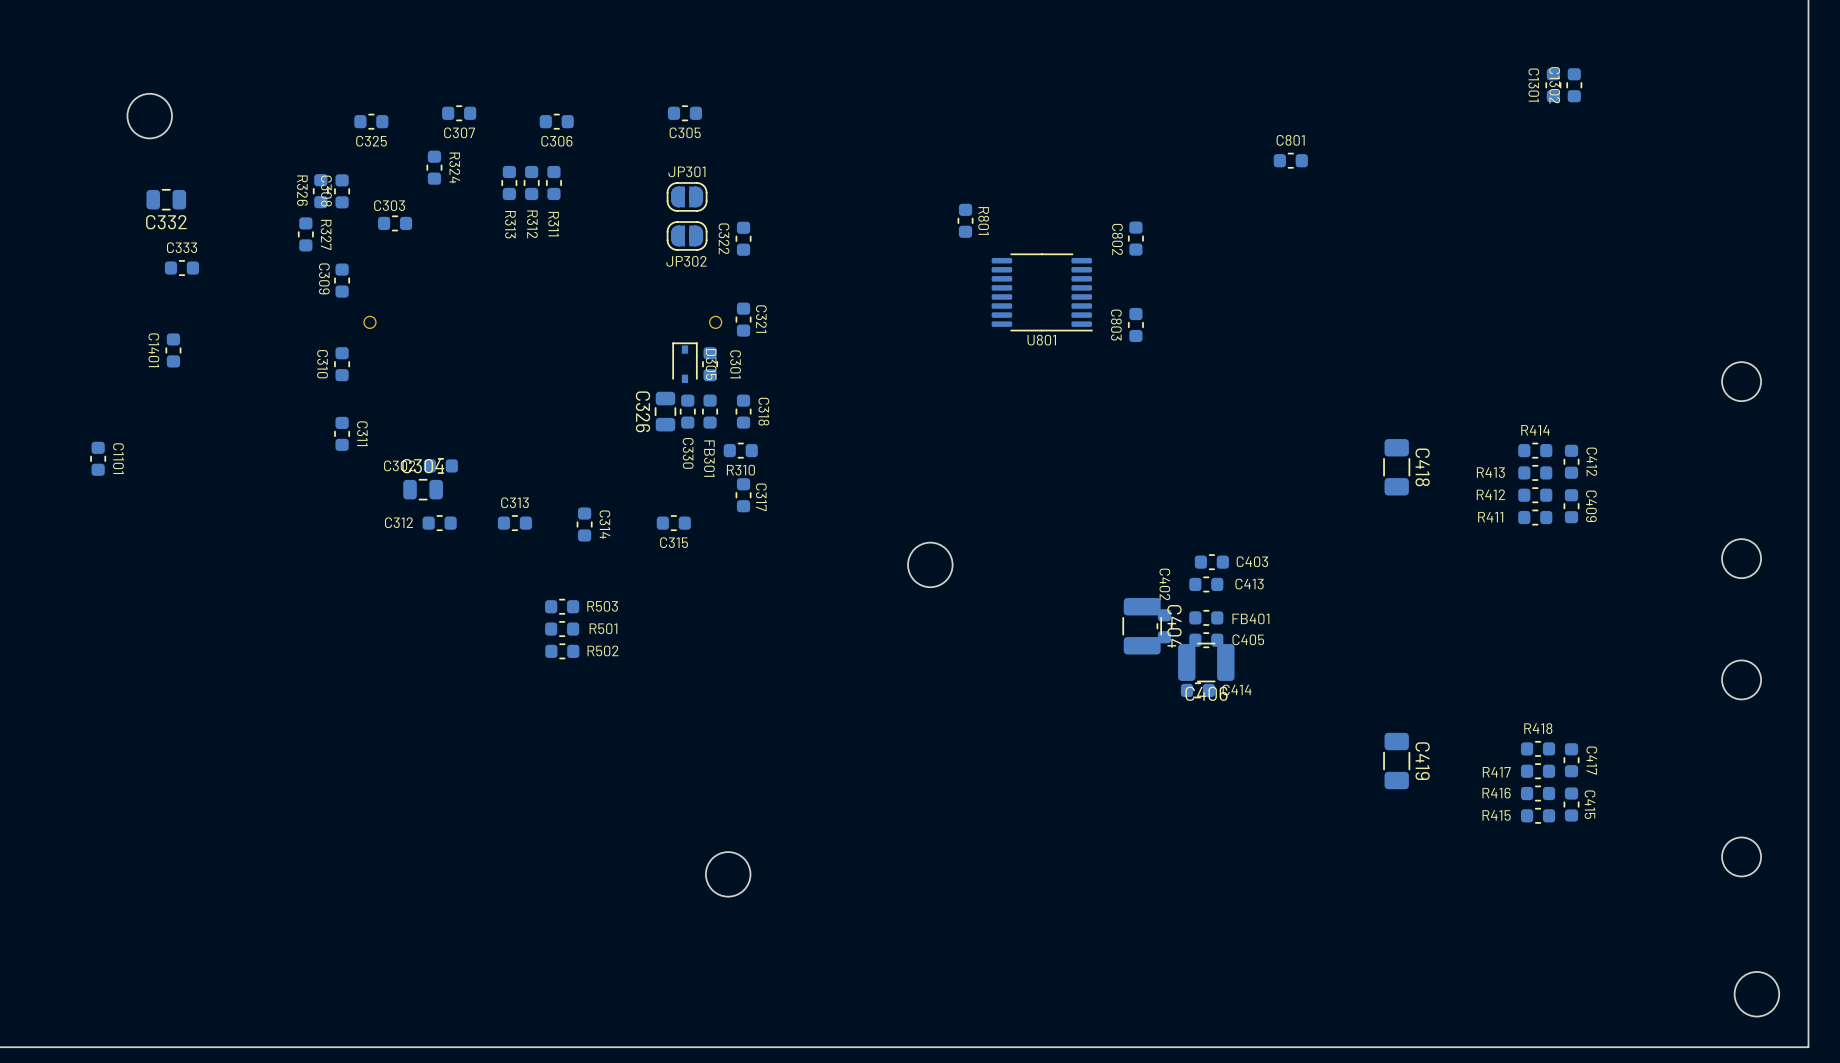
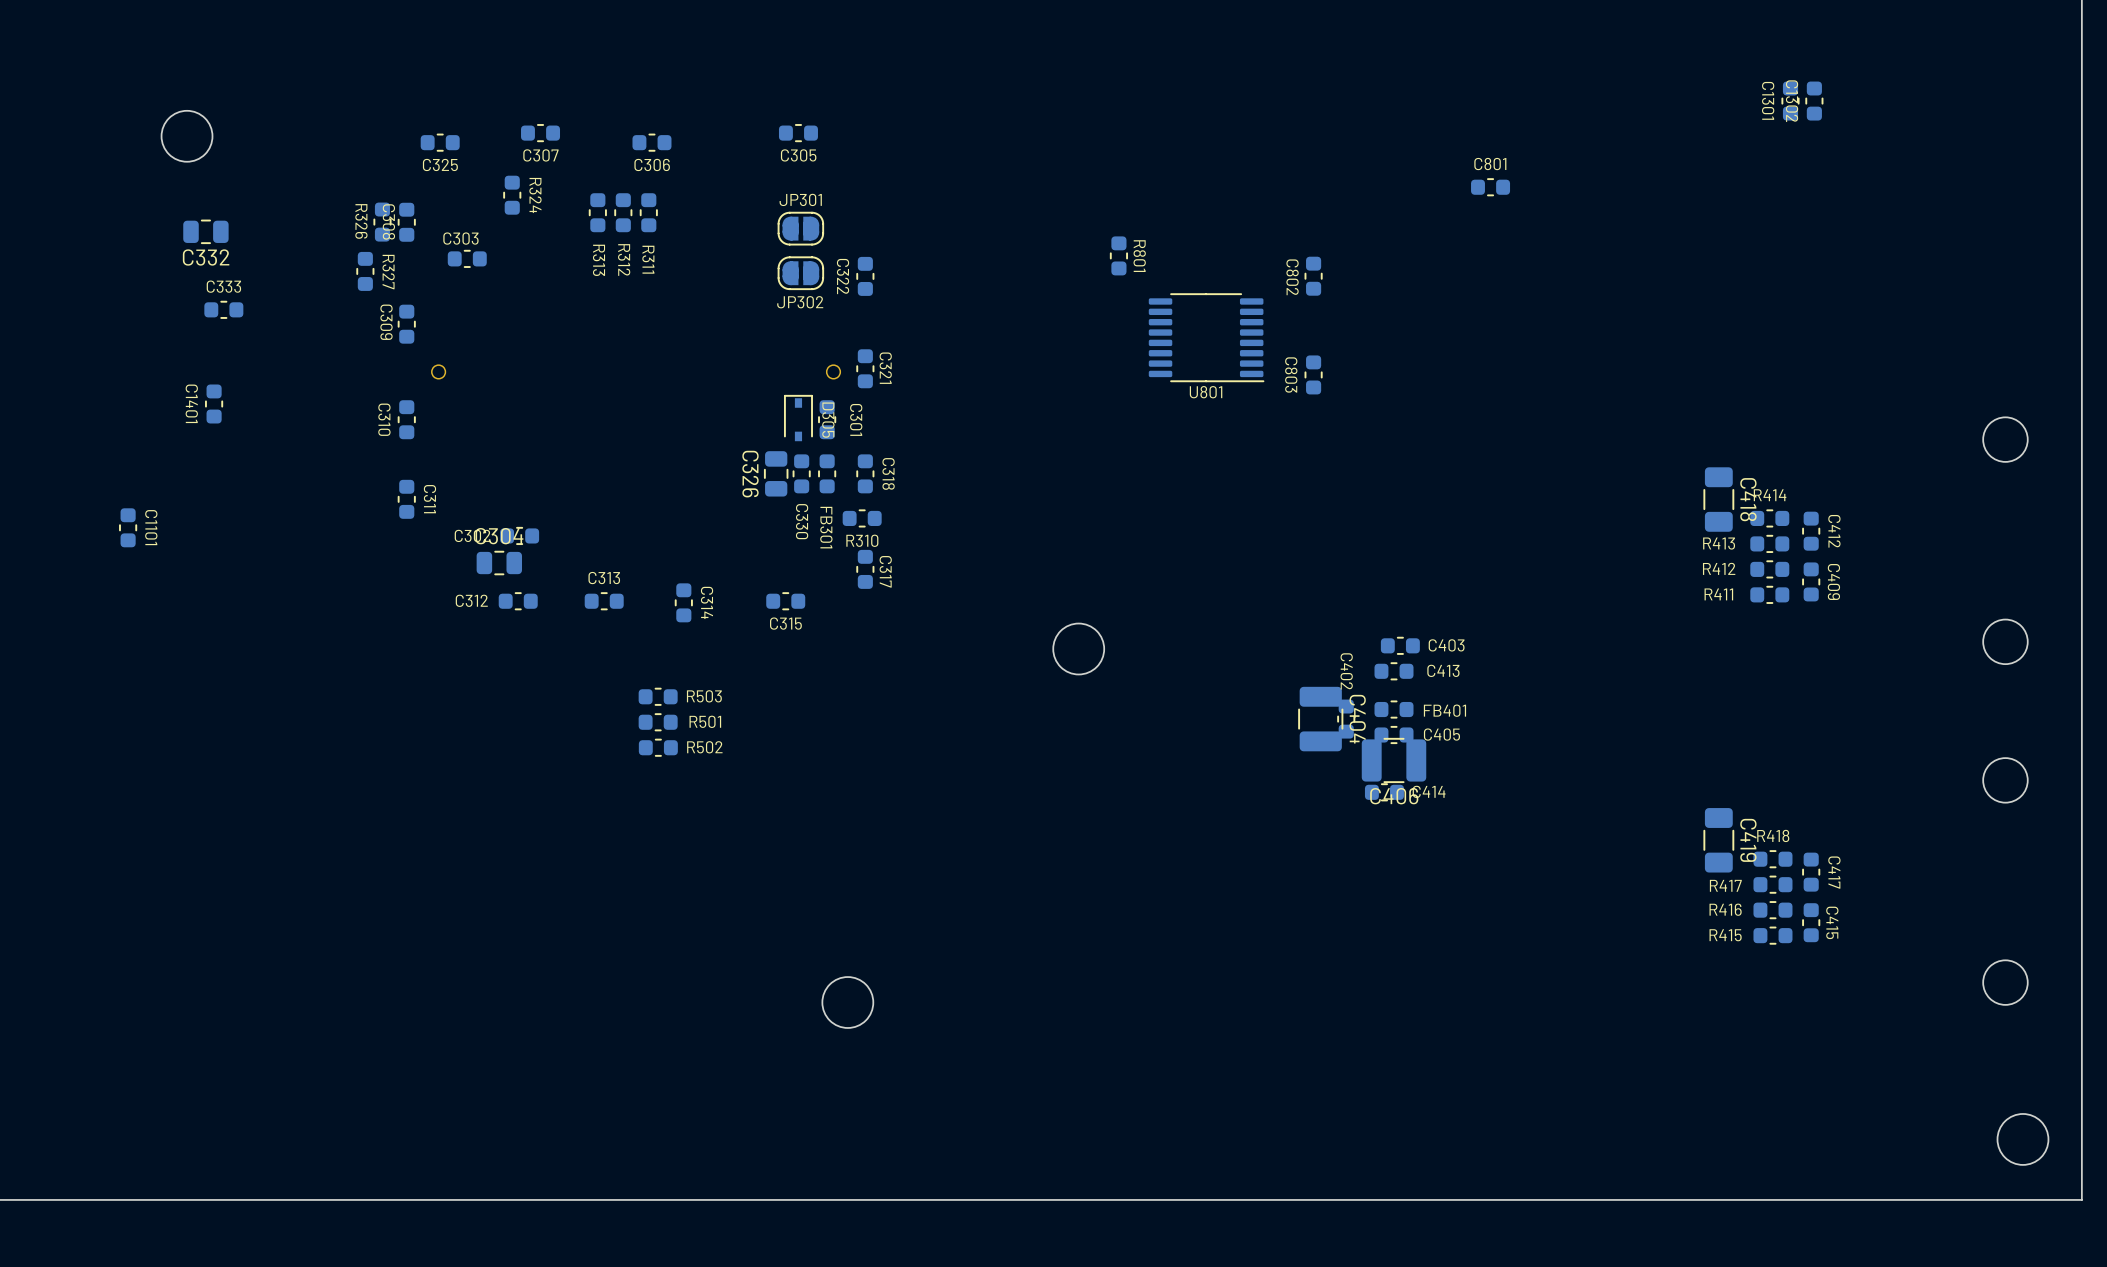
C418 position: (1396, 467) -> (1718, 499)
C419 position: (1396, 761) -> (1718, 840)

